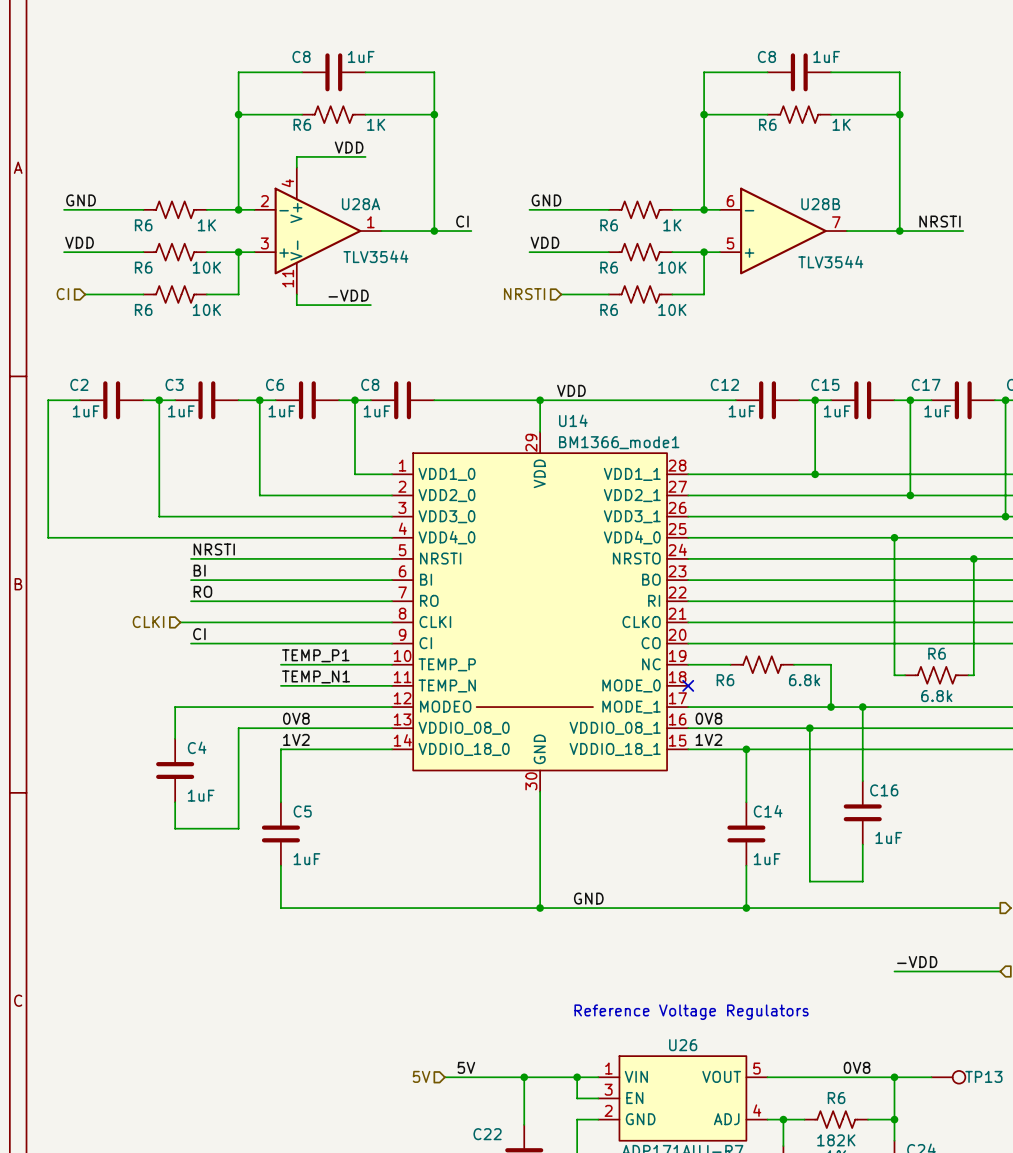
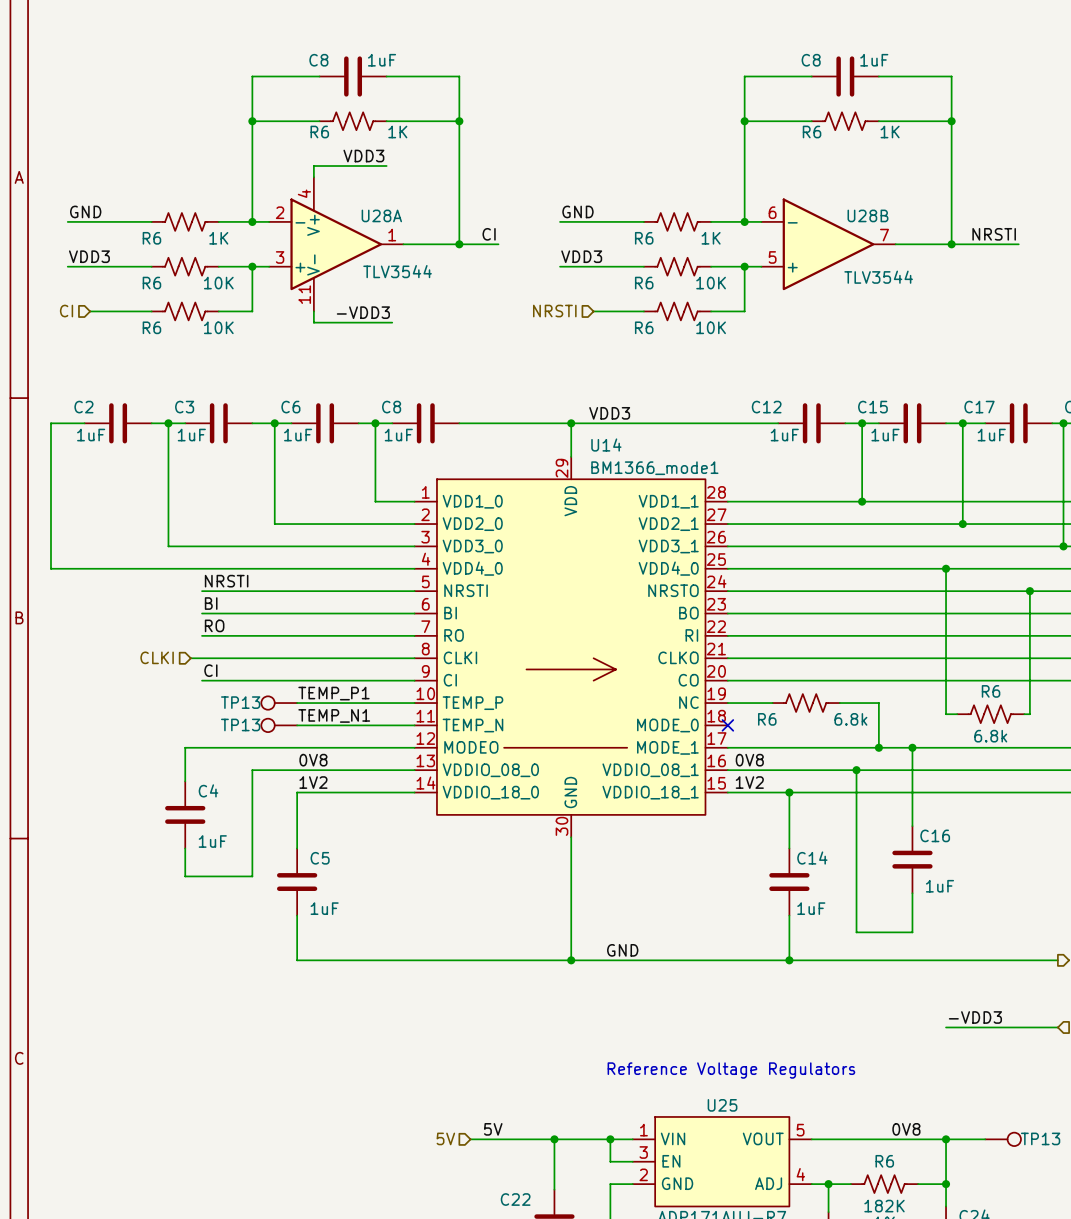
label: VDD (349, 147) -> VDD3 (363, 156)
label: VDD (79, 242) -> VDD3 (89, 256)
label: VDD (544, 242) -> VDD3 (581, 256)
label: -VDD (348, 295) -> -VDD3 (363, 312)
label: VDD (571, 390) -> VDD3 (609, 413)
U14 symbol: [392, 432, 689, 792] -> [414, 456, 728, 838]
TP13: none -> (279, 703)
TP13: none -> (279, 725)
label: -VDD (917, 962) -> -VDD3 (975, 1017)
U26 name: U26 (683, 1045) -> U25 (722, 1105)

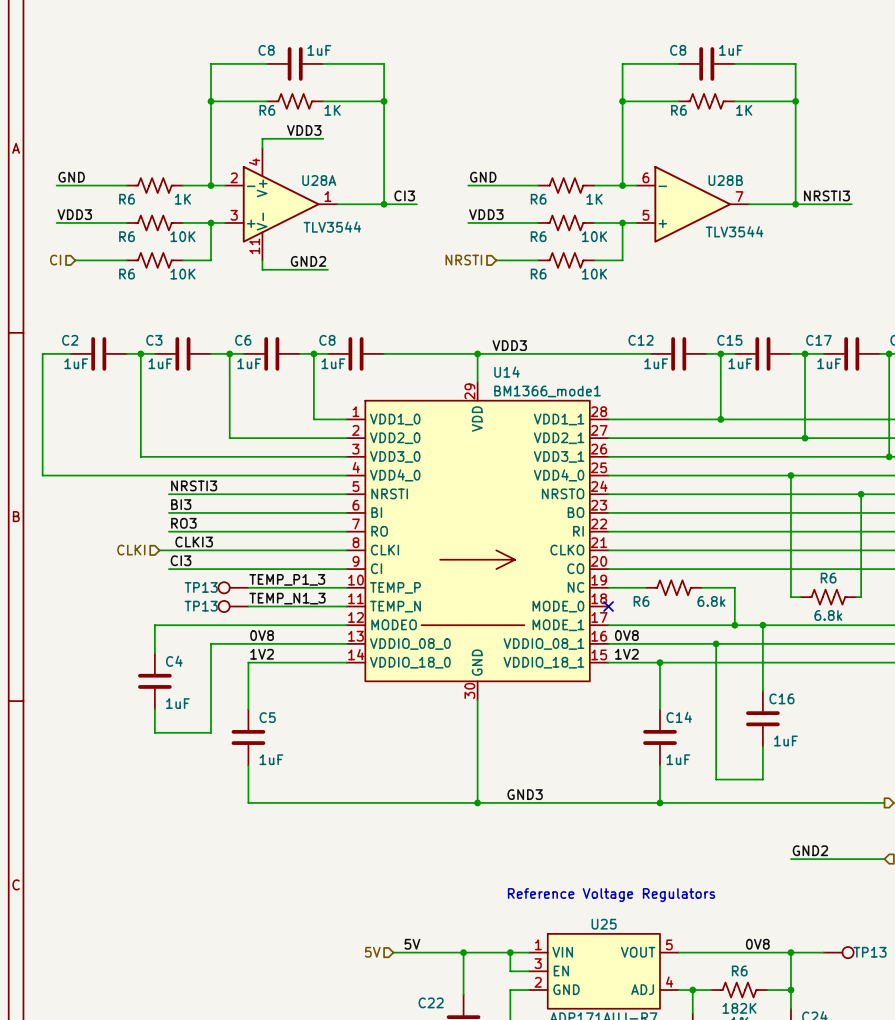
label: CI (489, 234) -> CI3 (404, 195)
label: NRSTI (994, 234) -> NRSTI3 (826, 195)
label: -VDD3 (363, 312) -> GND2 (308, 261)
label: NRSTI (226, 581) -> NRSTI3 (194, 485)
label: BI (211, 603) -> BI3 (181, 504)
label: RO (214, 625) -> RO3 (183, 523)
label: none -> CLKI3 (194, 542)
label: CI (210, 670) -> CI3 (181, 560)
label: TEMP_P1 (333, 693) -> TEMP_P1_3 (287, 579)
label: TEMP_N1 (334, 715) -> TEMP_N1_3 (287, 598)
label: GND (622, 950) -> GND3 (525, 794)
label: -VDD3 (975, 1017) -> GND2 (810, 850)

